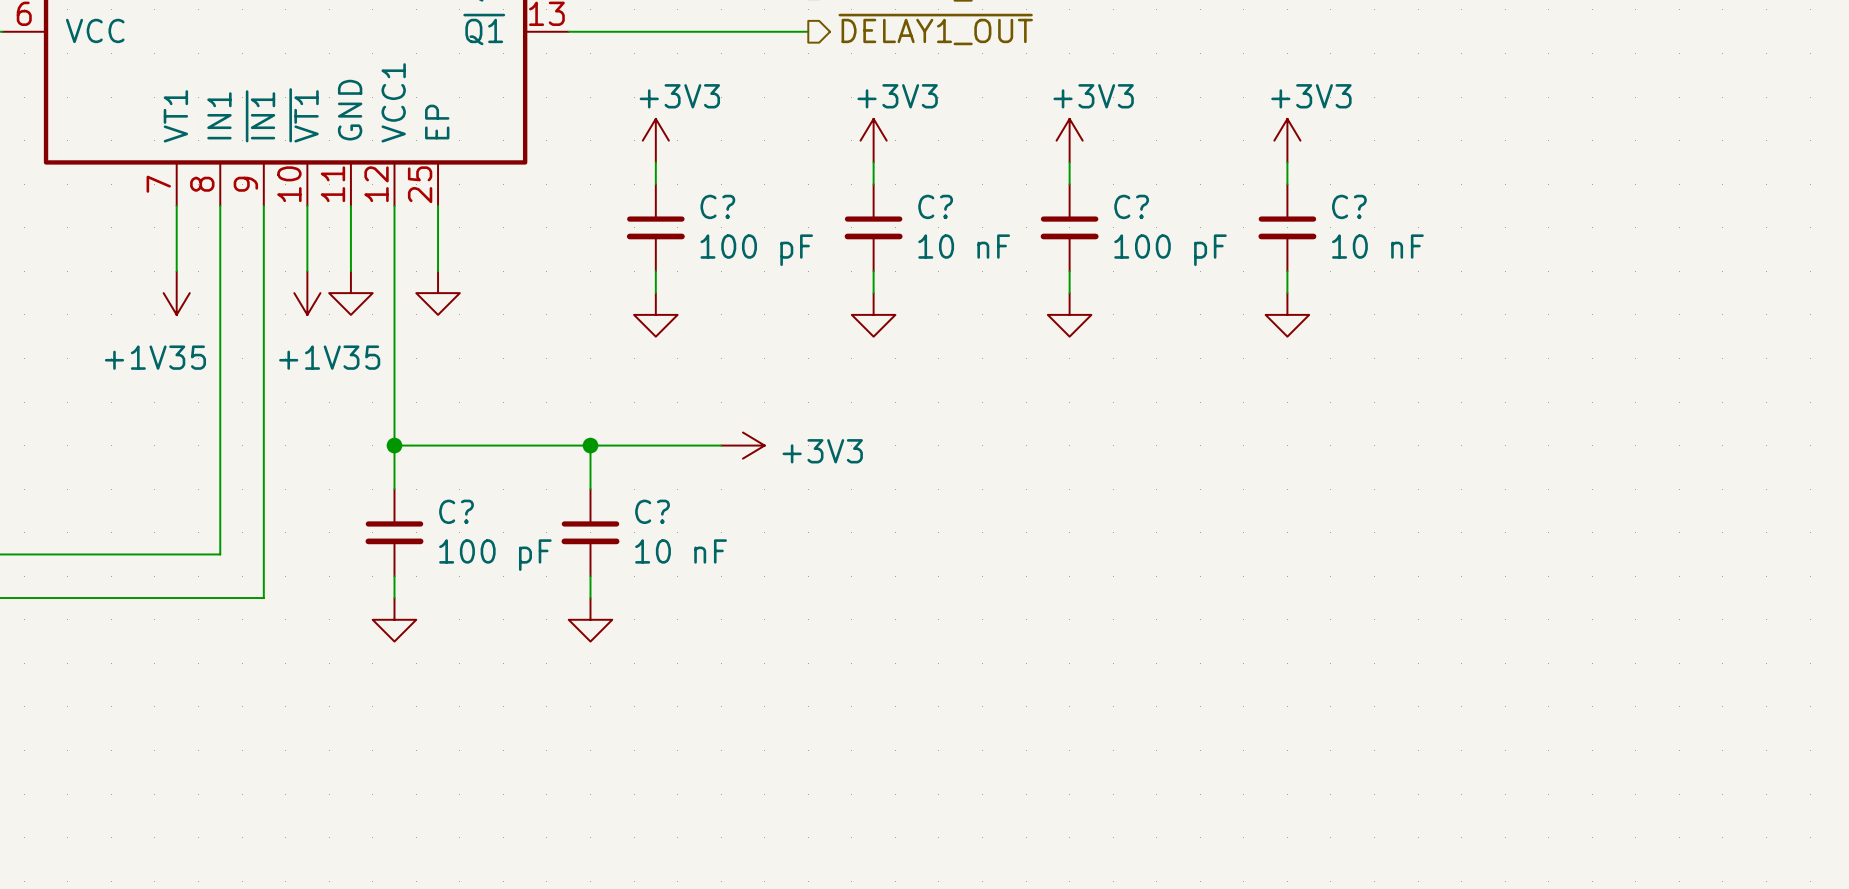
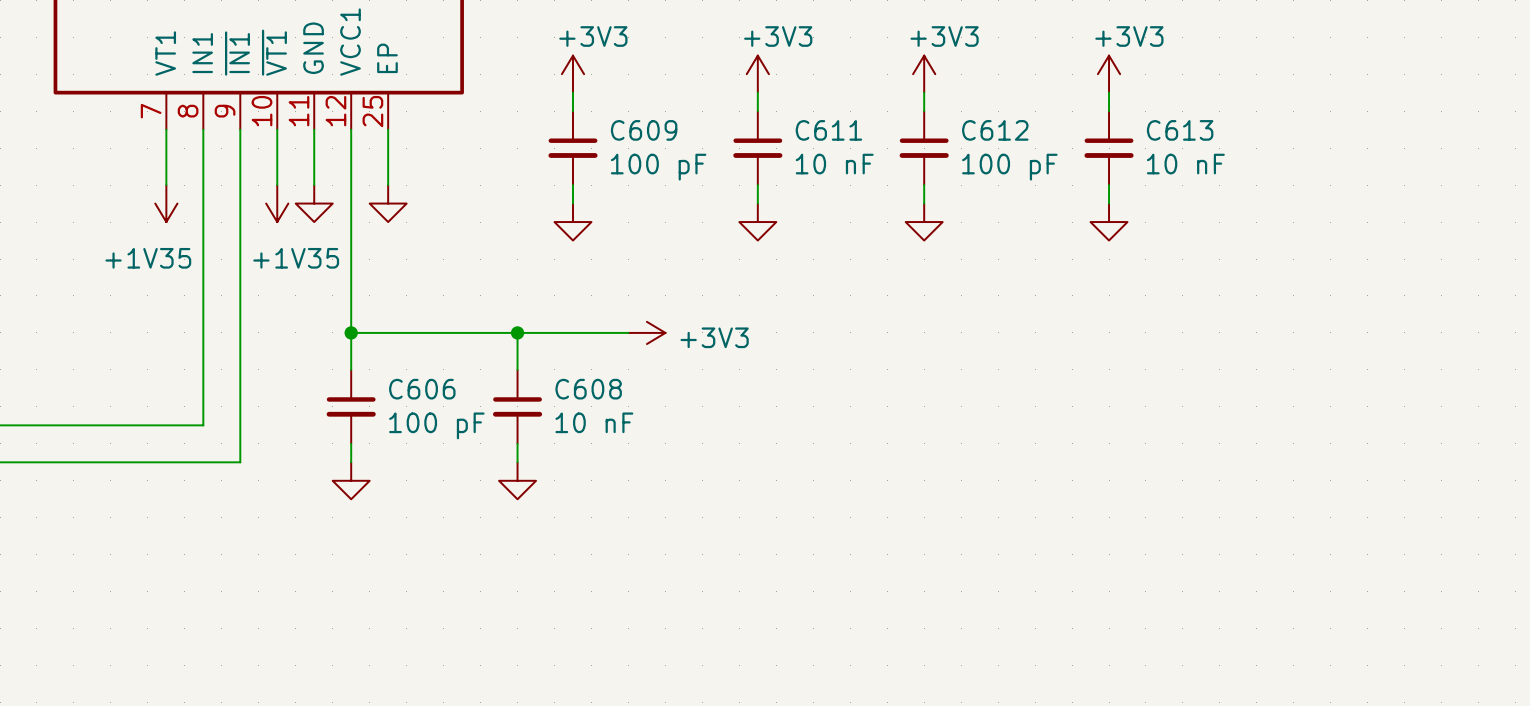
C? name: C? (717, 206) -> C609 (644, 130)
C? name: C? (935, 206) -> C611 (828, 130)
C? name: C? (1131, 206) -> C612 (995, 130)
C? name: C? (1349, 206) -> C613 (1180, 130)
C? name: C? (456, 511) -> C606 (422, 389)
C? name: C? (652, 511) -> C608 (588, 389)

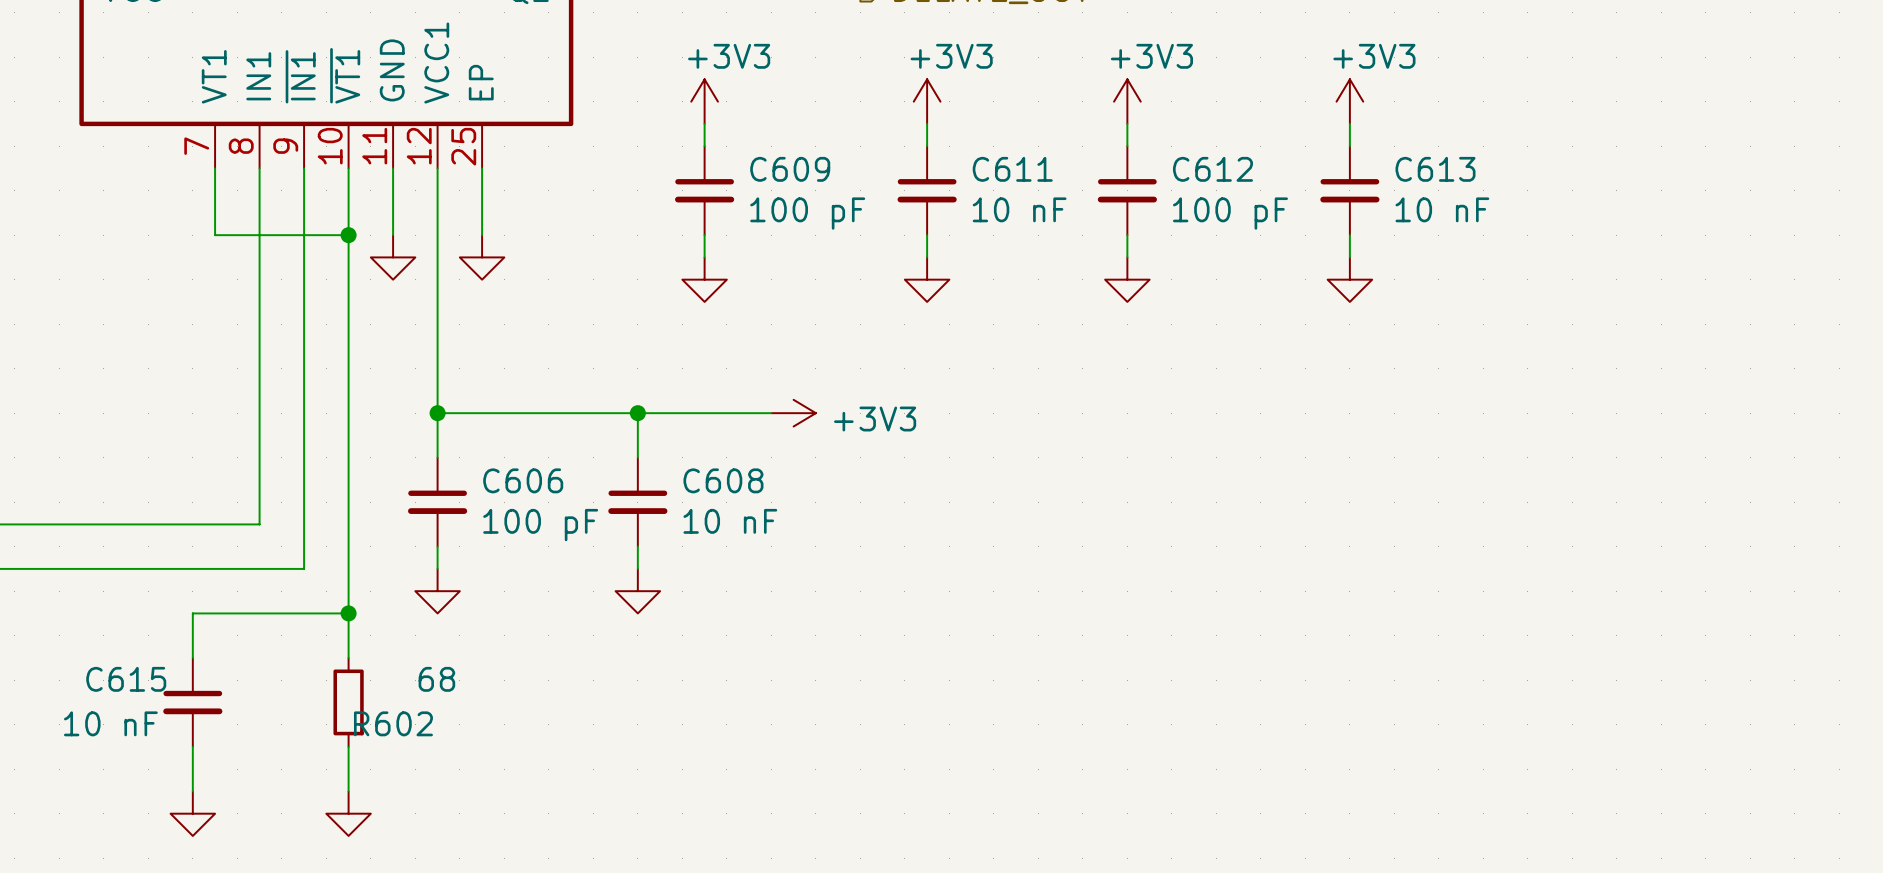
wire: none -> (215, 235) (348, 235) (348, 657)
junction: none -> (348, 235)
power symbol: +1V35 (166, 203) -> none
power symbol: +1V35 (277, 203) -> none
wire: none -> (348, 613) (192, 613) (192, 657)
junction: none -> (348, 613)
C615: none -> 10 nF (192, 702)
R602: none -> 68 (348, 702)
wire: none -> (192, 746) (192, 791)
wire: none -> (348, 746) (348, 791)
power symbol: none -> (192, 813)
power symbol: none -> (348, 813)

